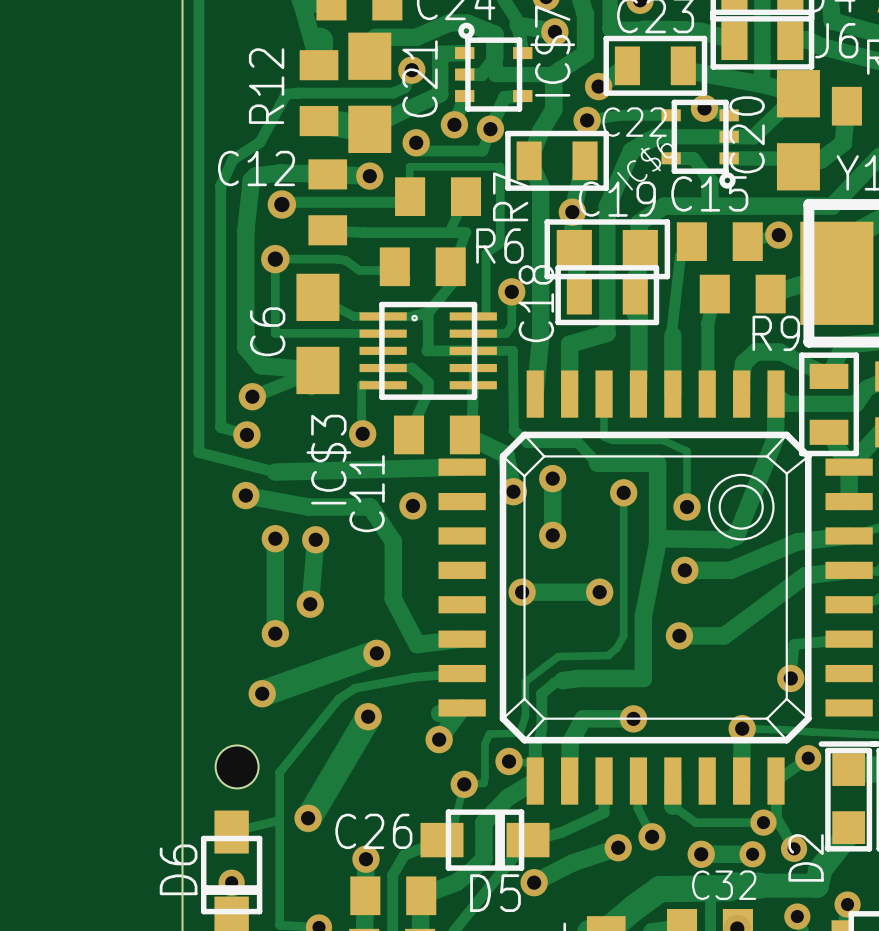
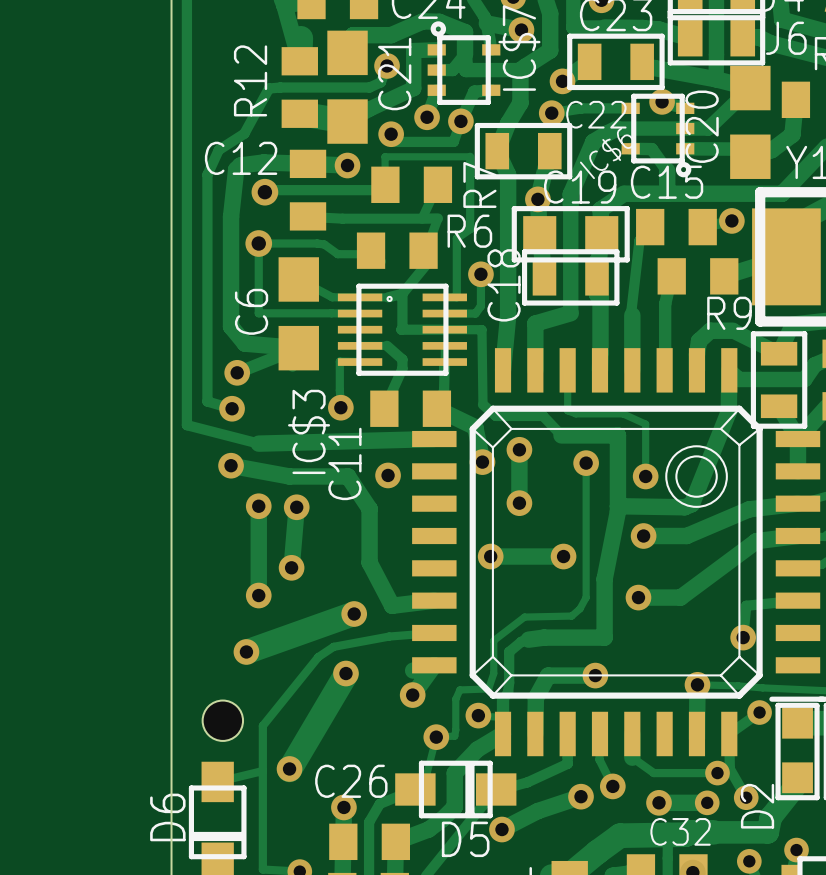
via: (231, 882) -> none

